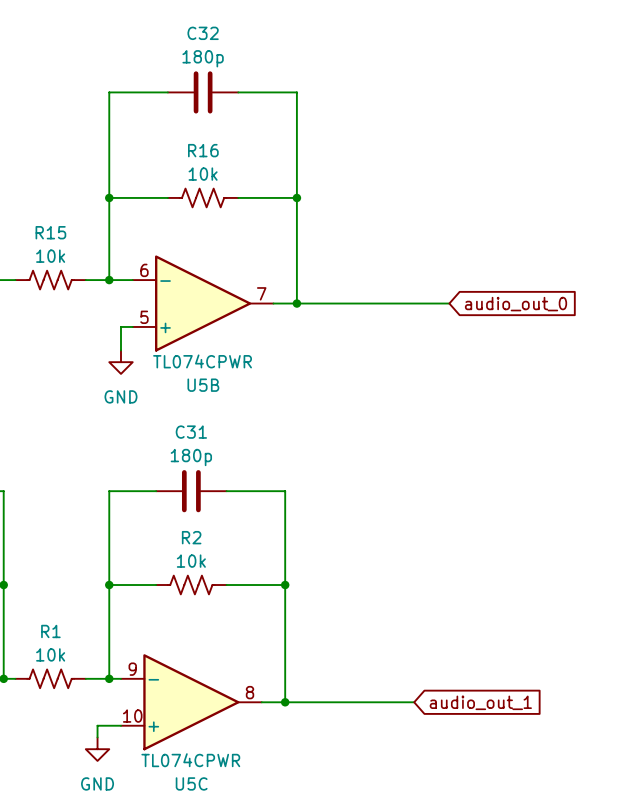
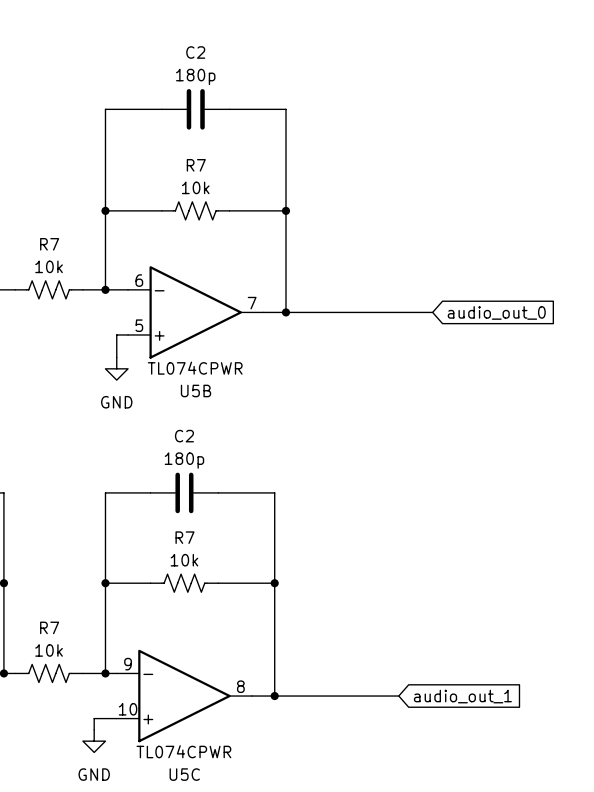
C32 name: C32 (203, 33) -> C2 (195, 52)
R16 name: R16 (203, 150) -> R7 (196, 165)
R15 name: R15 (50, 232) -> R7 (49, 244)
C31 name: C31 (191, 432) -> C2 (184, 436)
R2 name: R2 (191, 537) -> R7 (184, 537)
R1 name: R1 (50, 631) -> R7 (49, 627)

